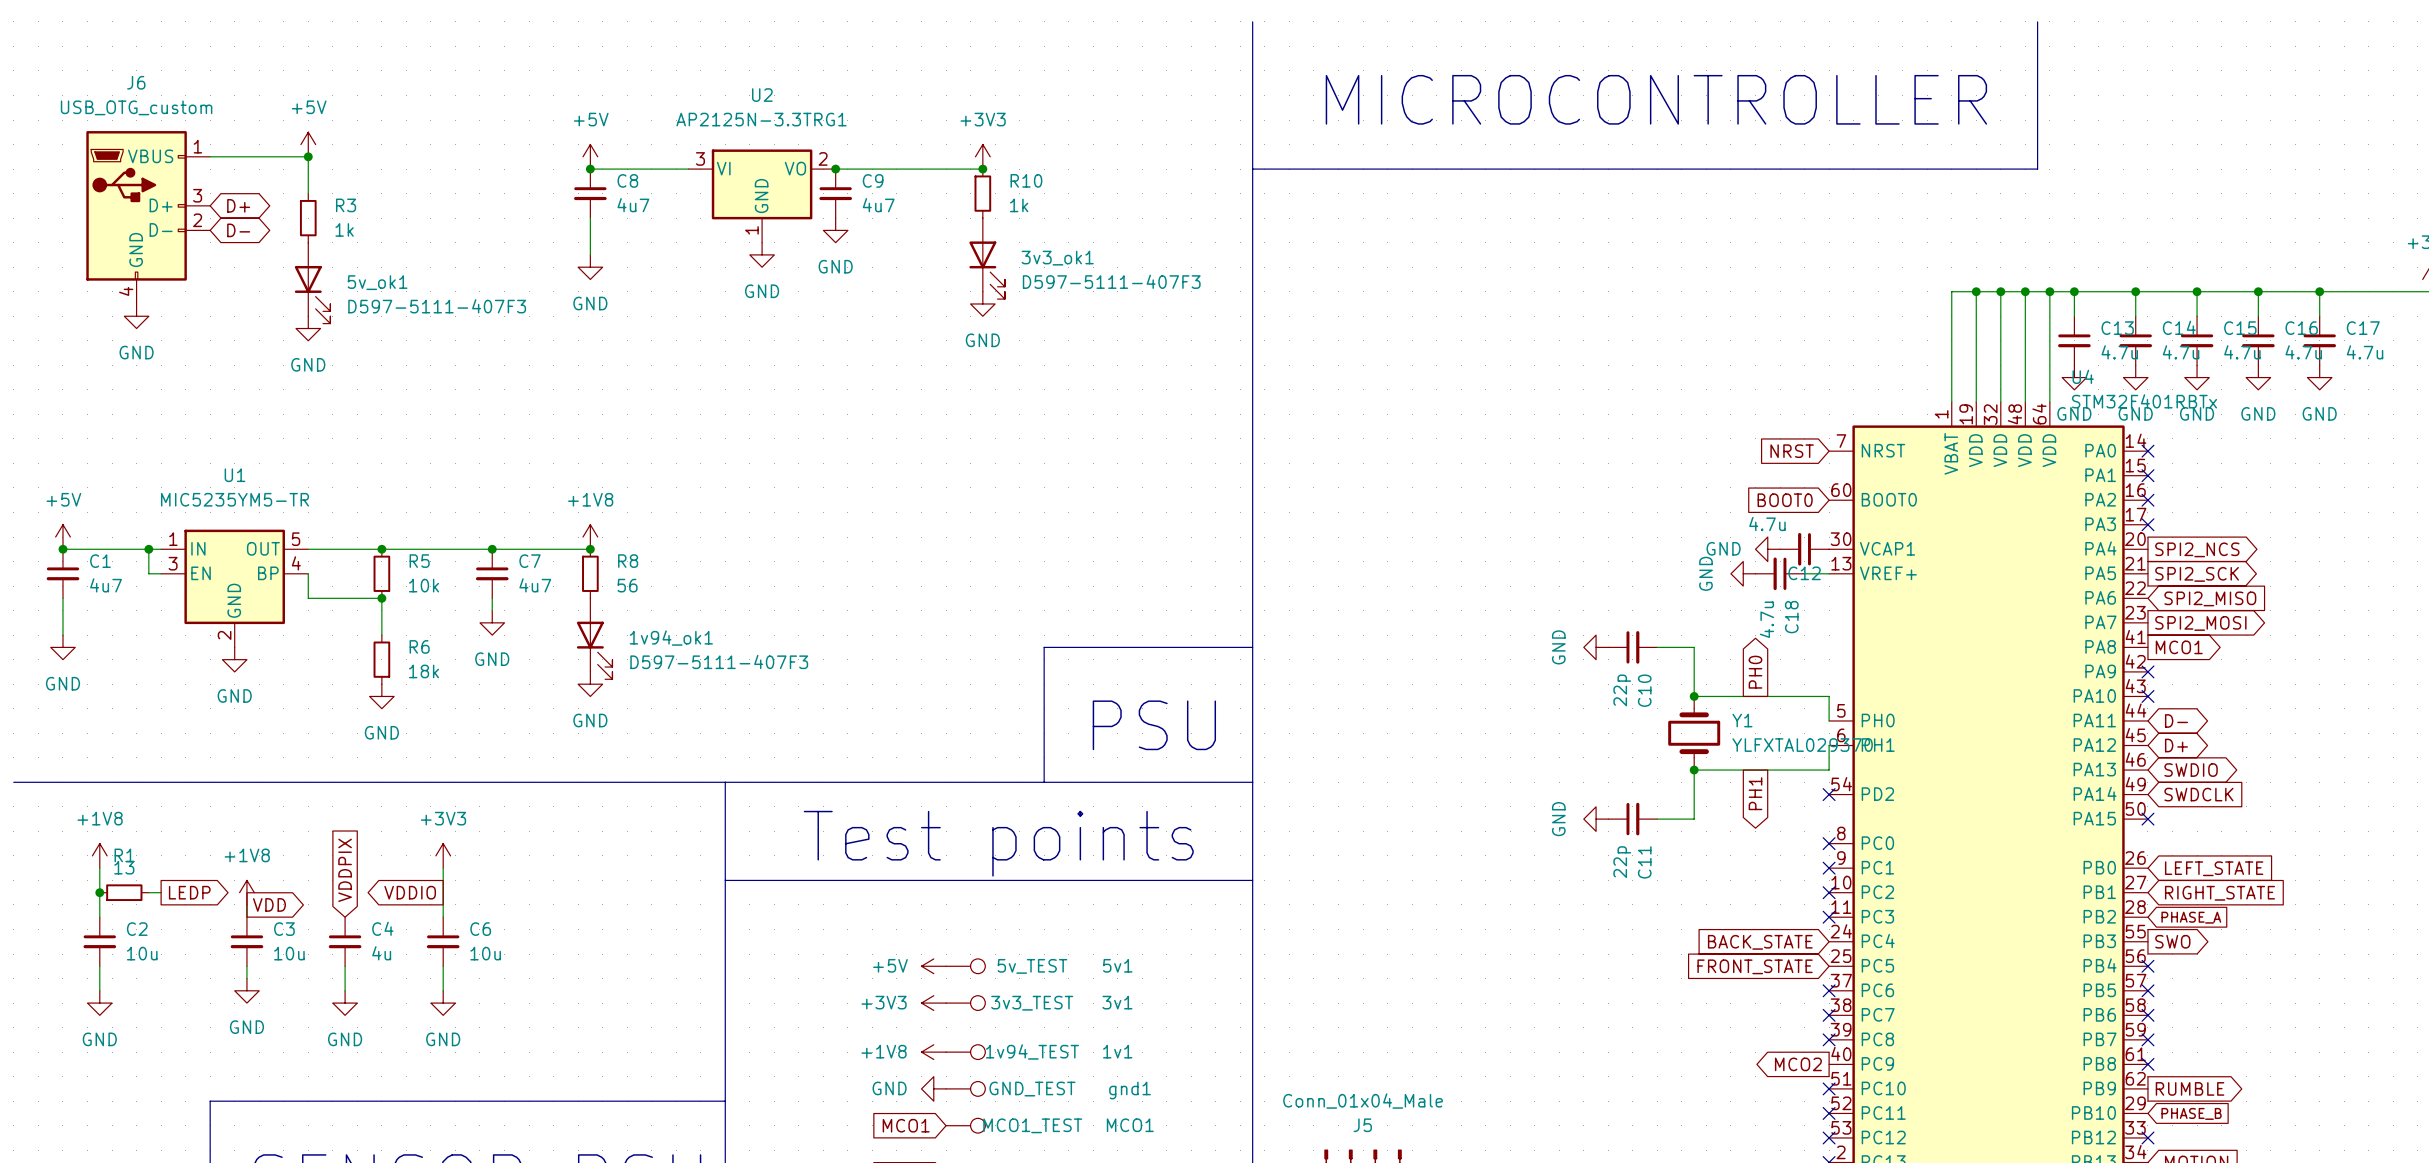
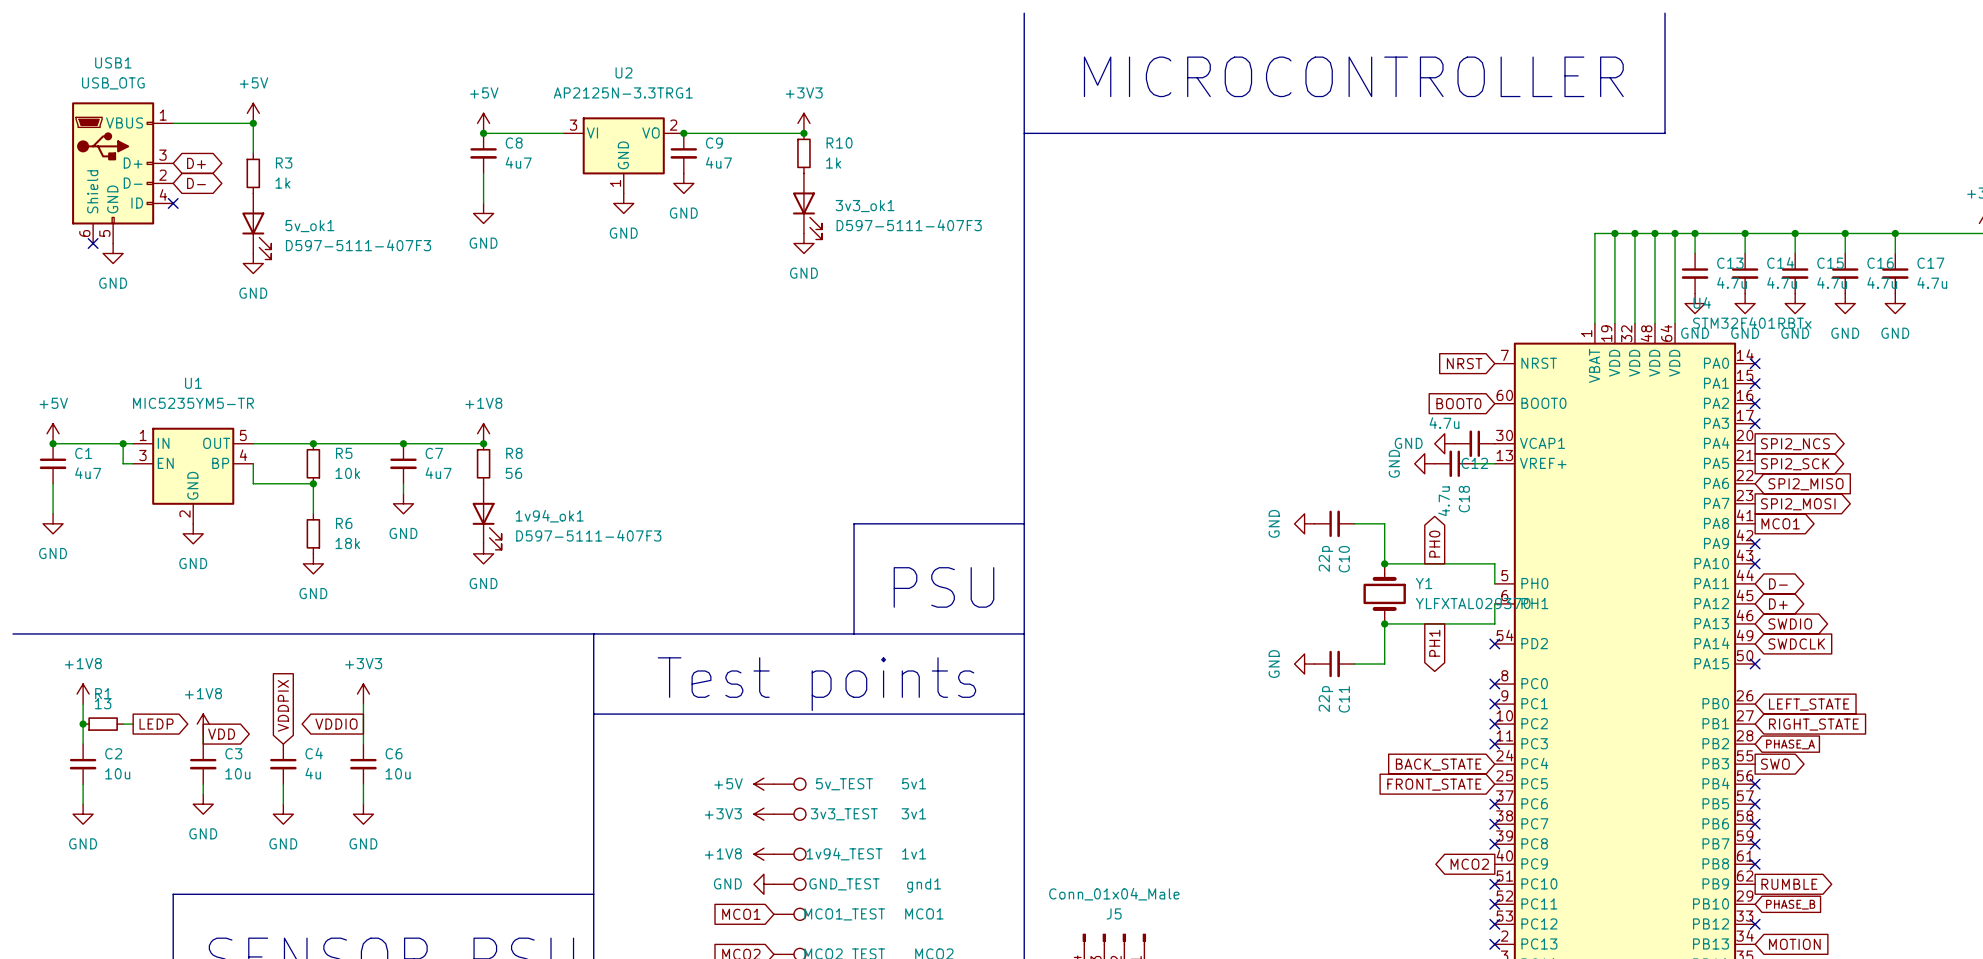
J6: USB_OTG_custom (148, 217) -> none
USB1: none -> USB_OTG (122, 172)
no-connect mark: none -> (173, 203)
no-connect mark: none -> (93, 243)

